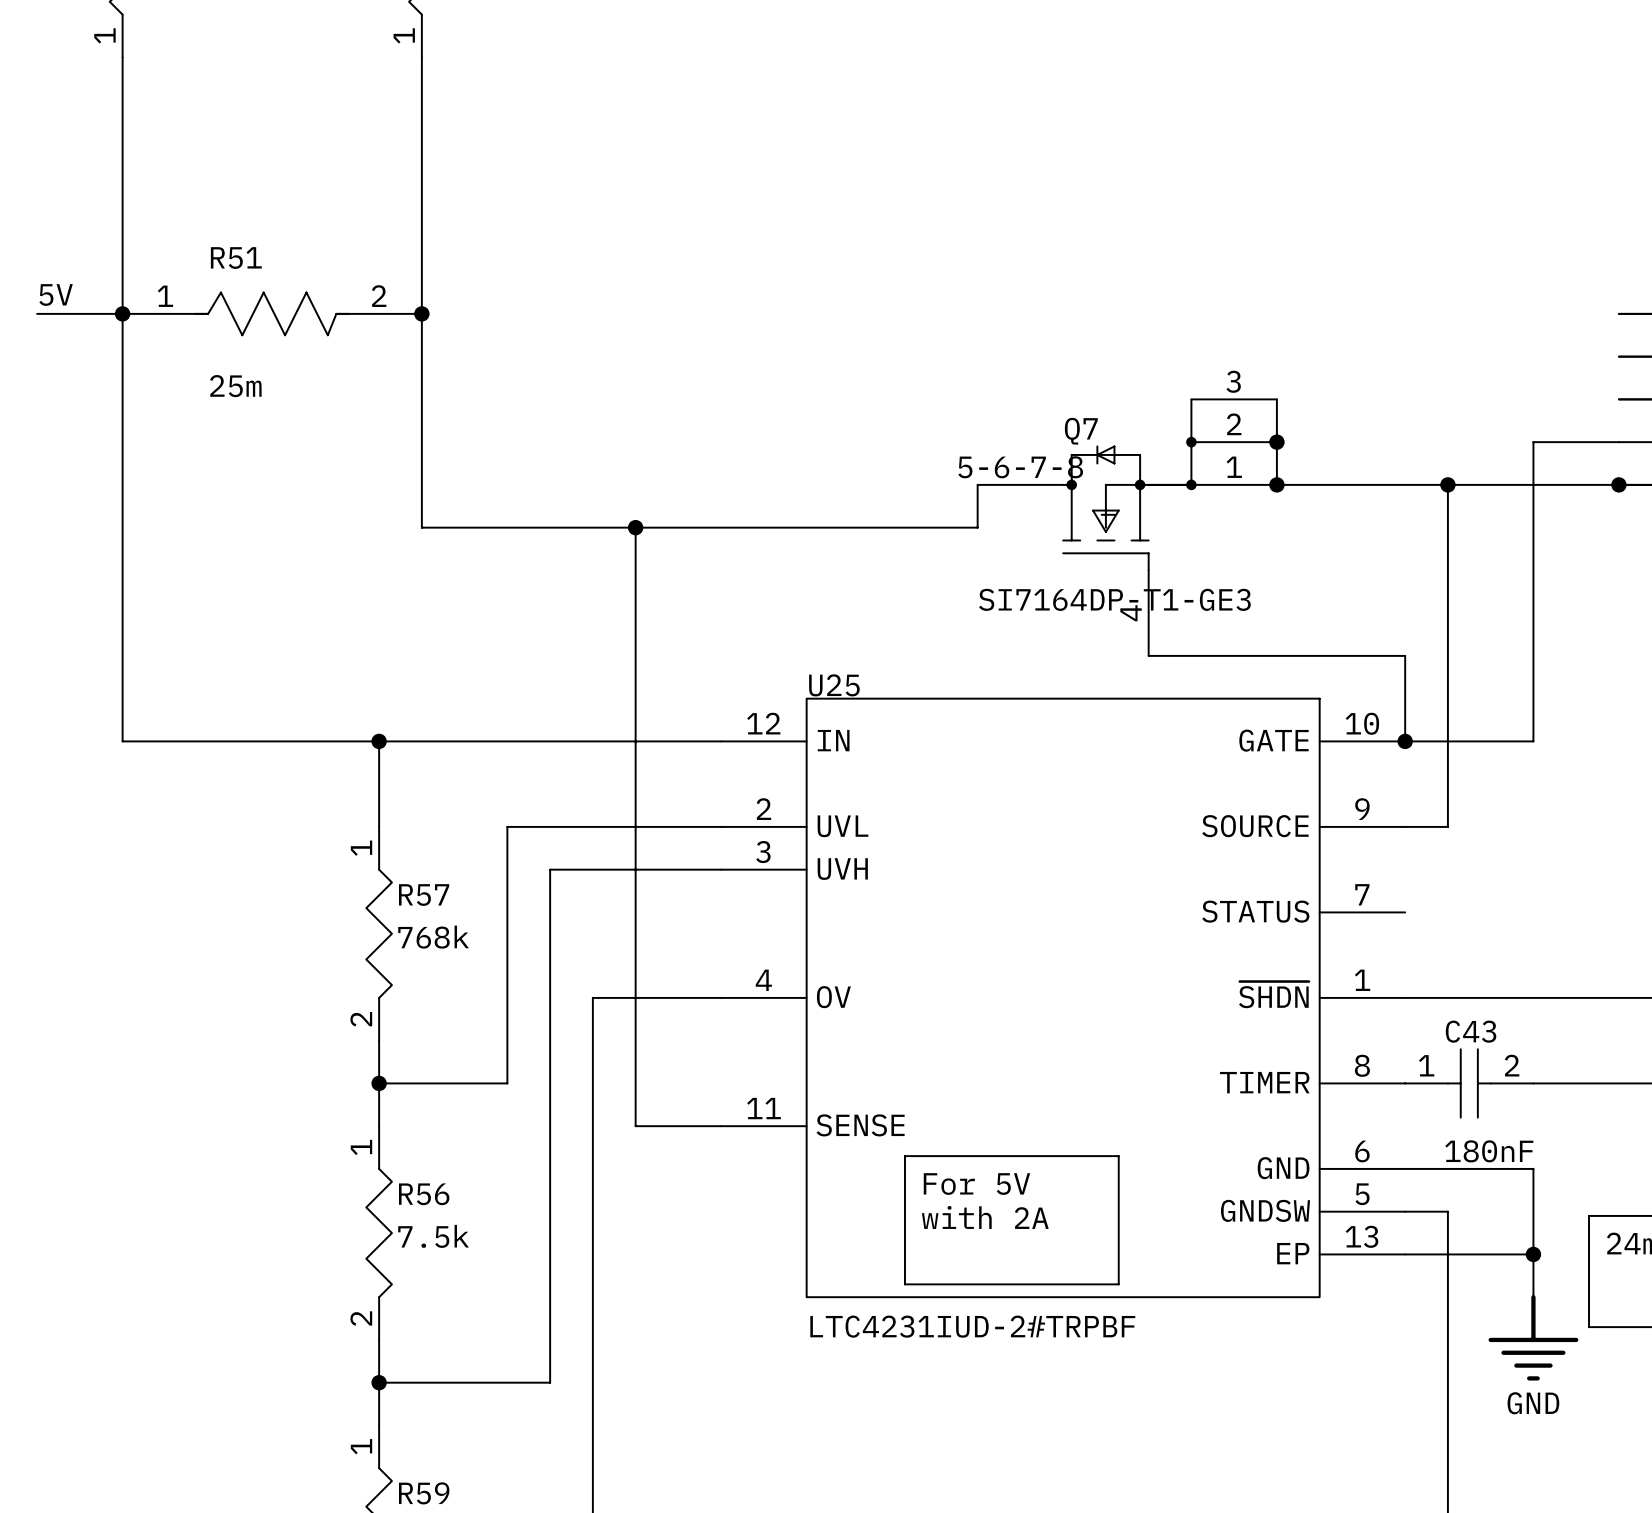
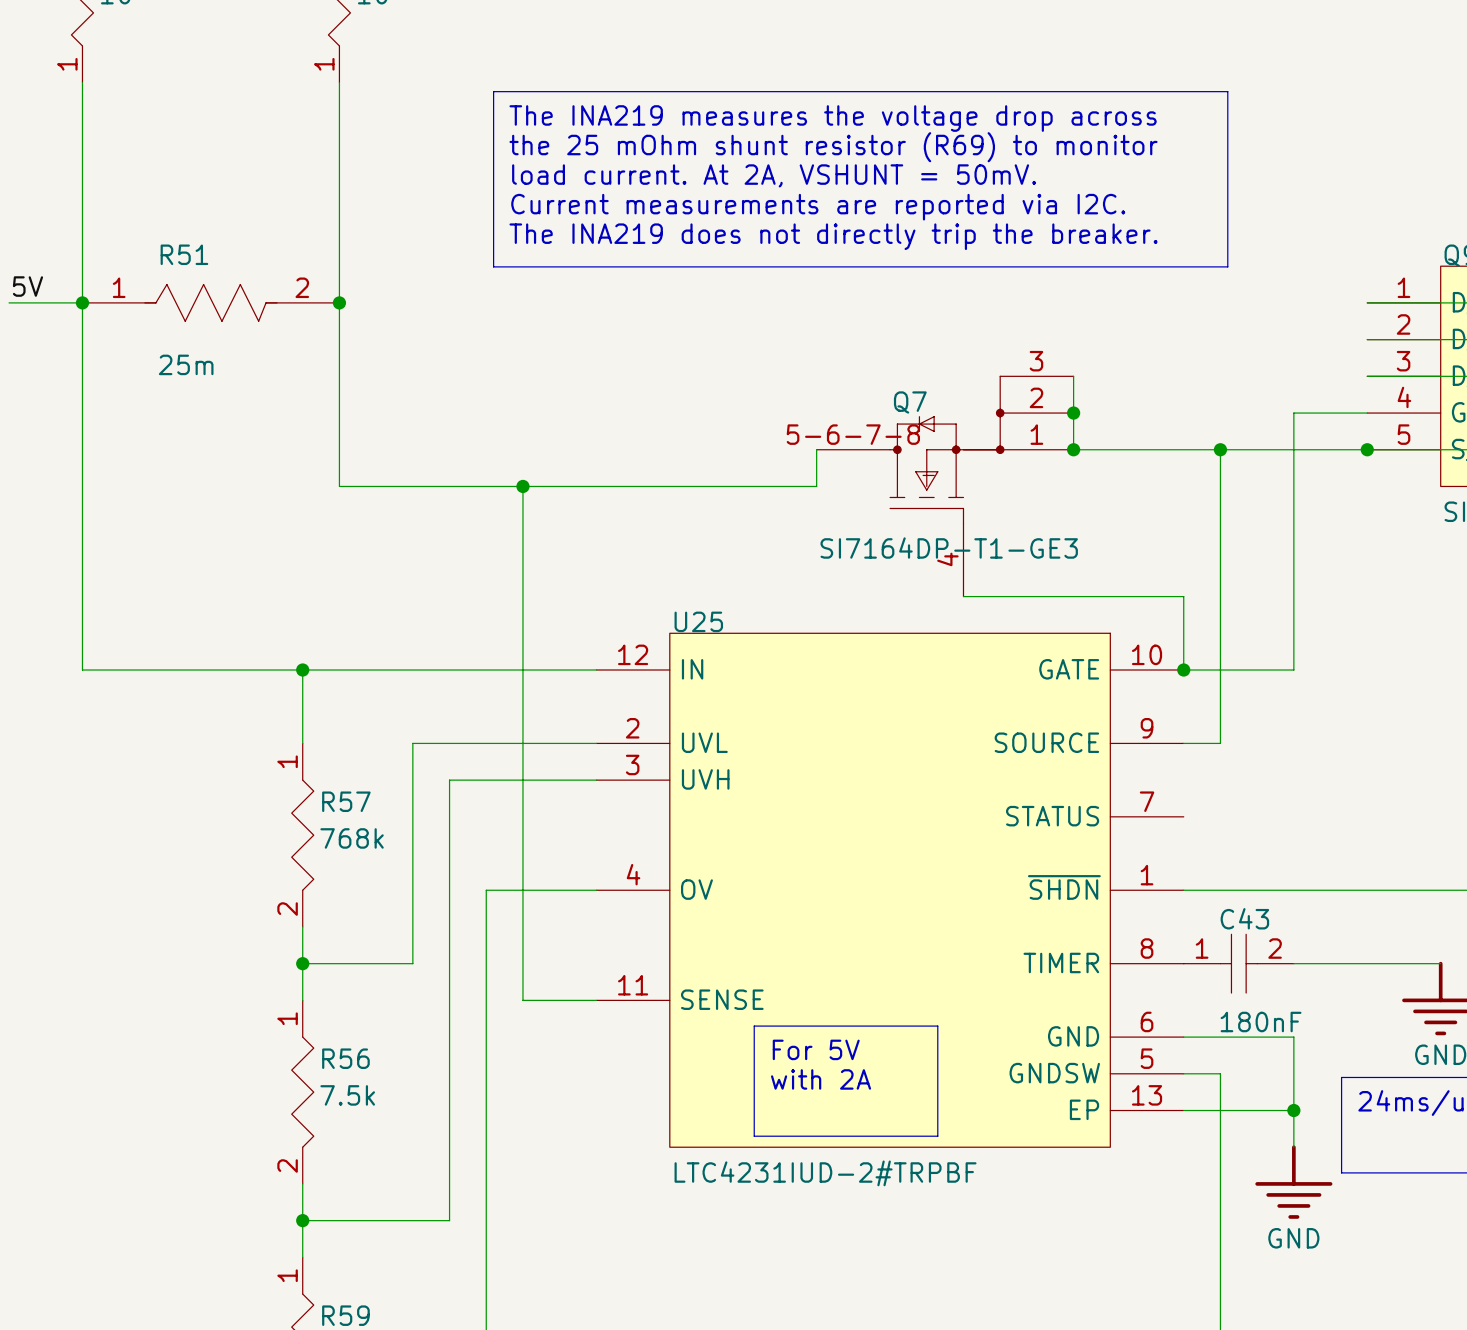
line: none -> (493, 91) (1227, 91) (1227, 266) (493, 266) (493, 91)
text: none -> The INA219 measures the voltage drop across (833, 118)
text: none -> the 25 mOhm shunt resistor (R69) to monitor (833, 147)
text: none -> load current. At 2A, VSHUNT = 50mV. (774, 175)
text: none -> Current measurements are reported via I2C. (818, 207)
text: none -> The INA219 does not directly trip the breaker. (833, 236)

